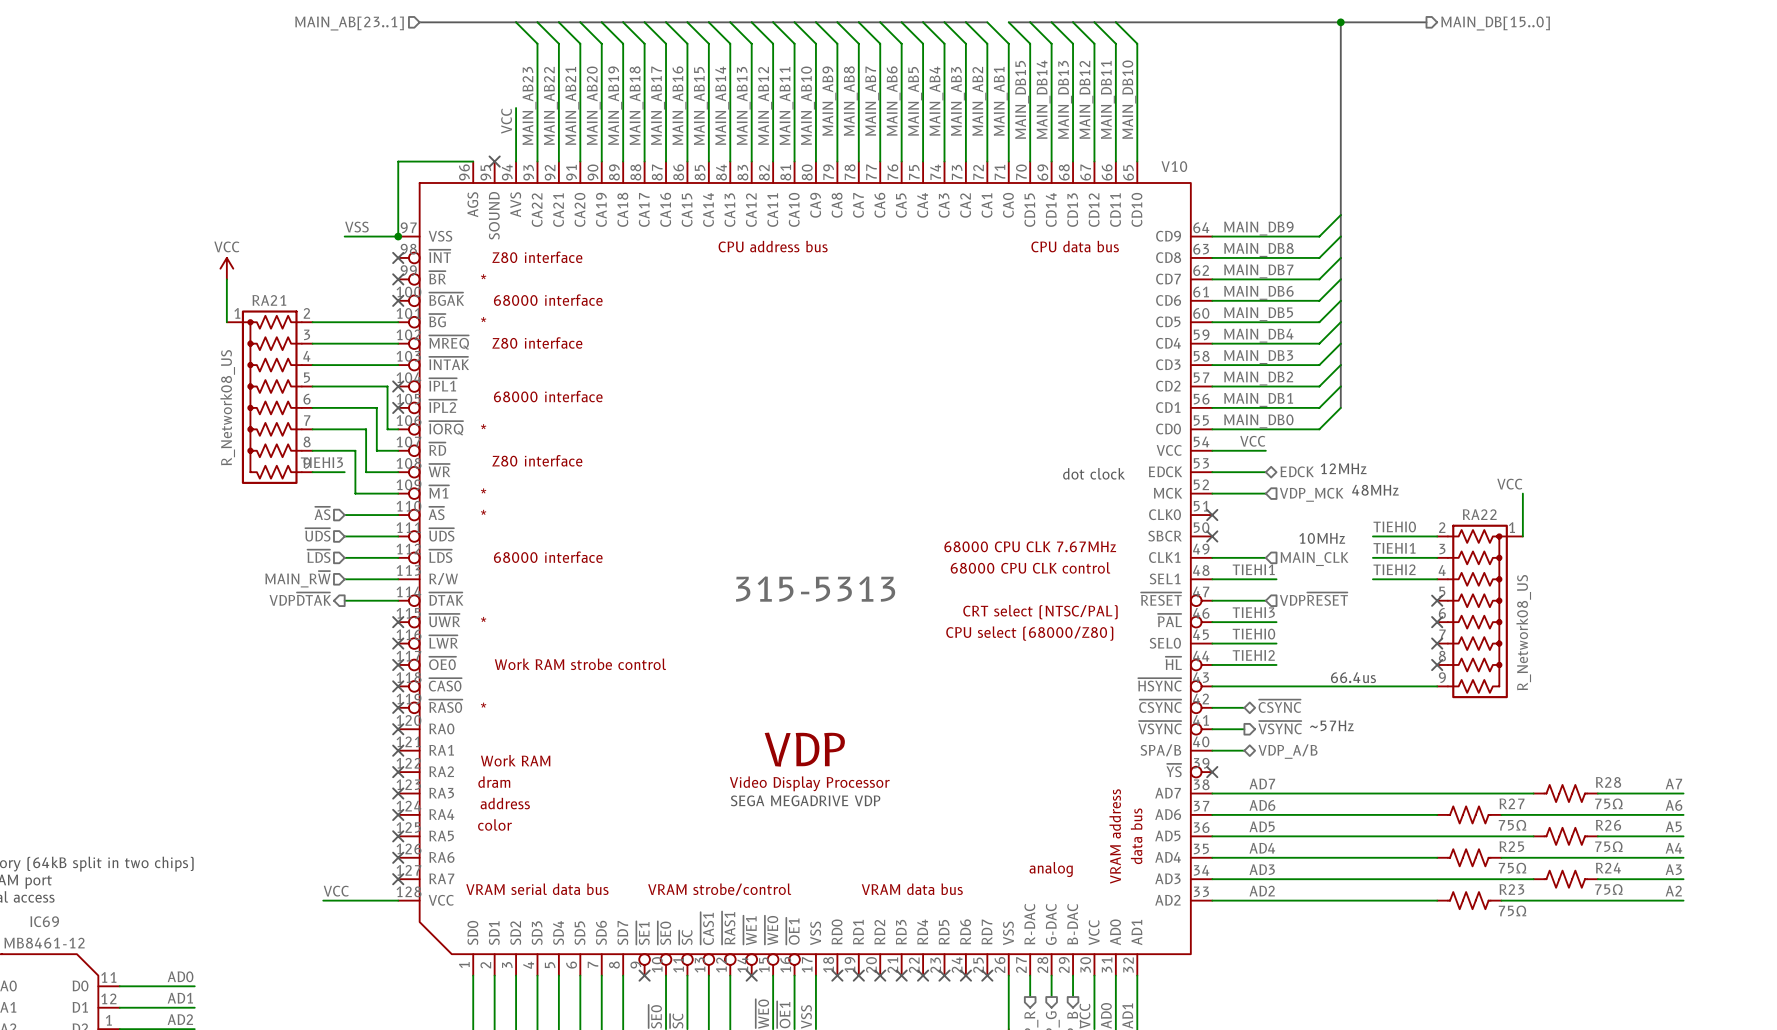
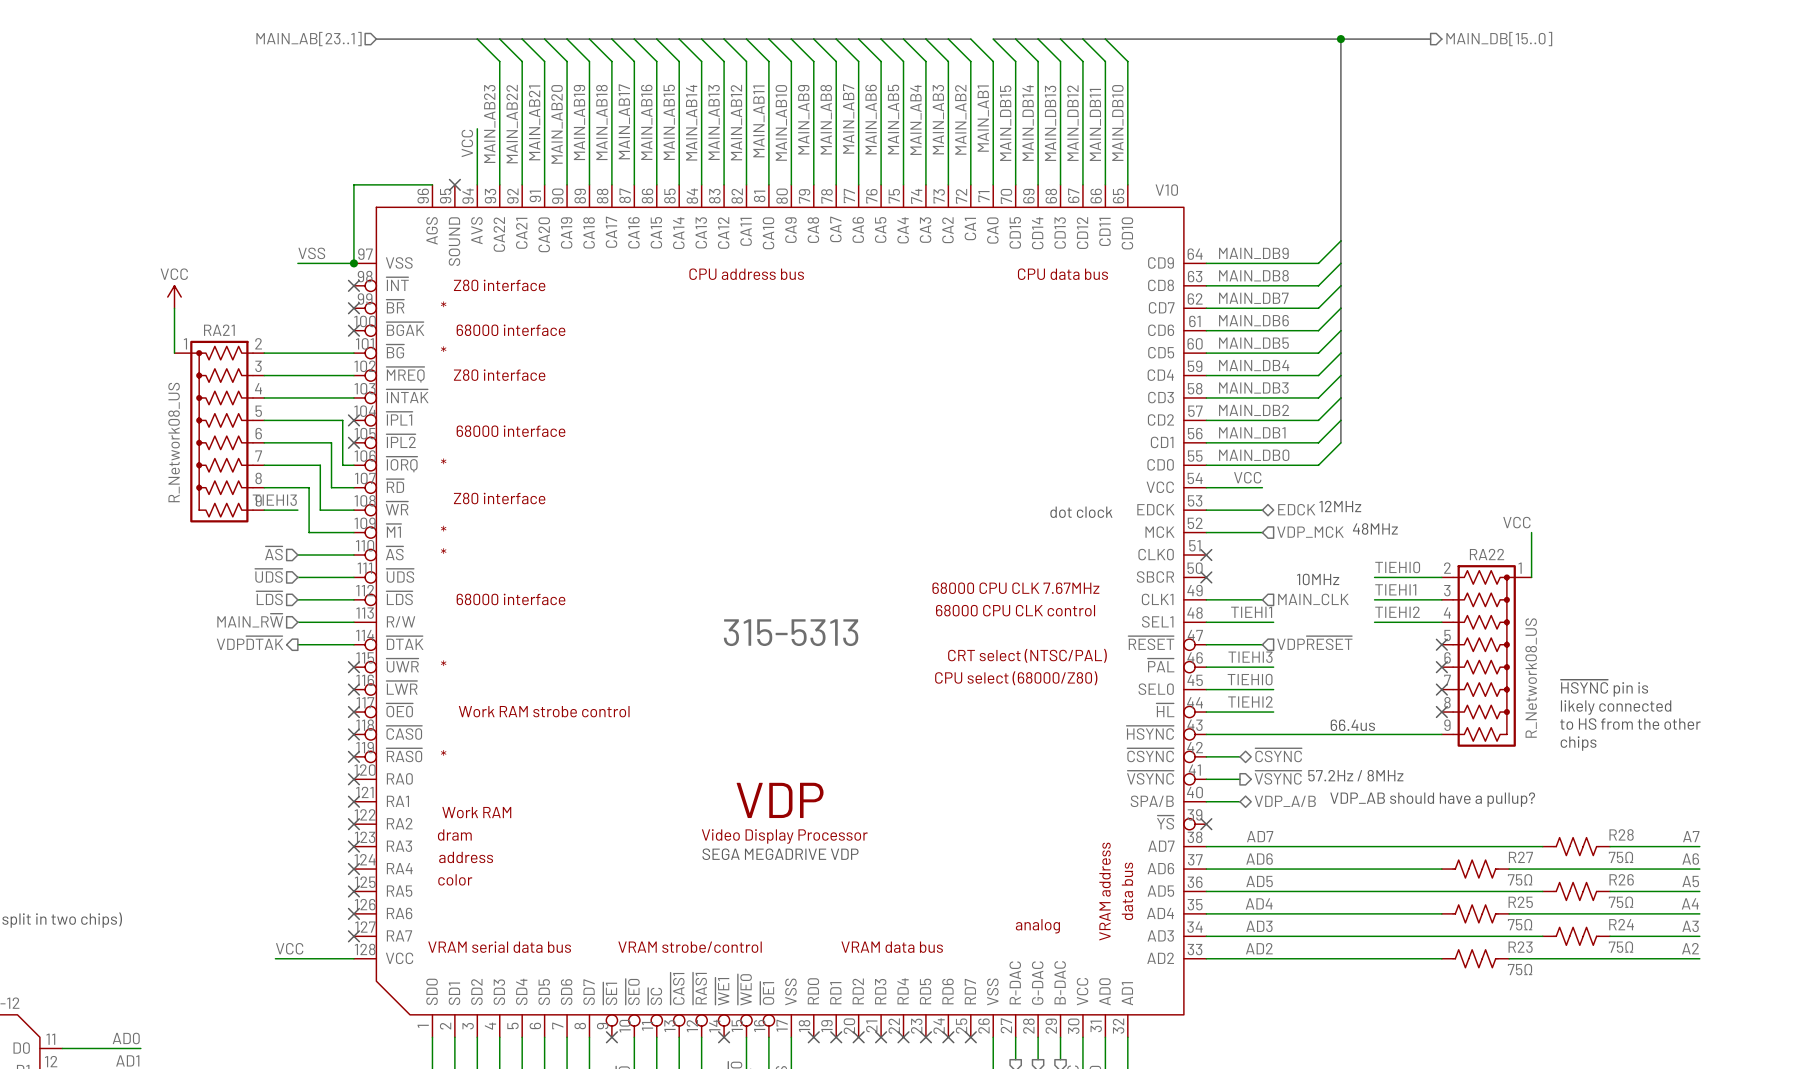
text: none -> ~{HSYNC} pin is (1604, 688)
text: none -> likely connected (1616, 707)
text: none -> to HS from the other (1630, 724)
text: none -> chips (1578, 743)
text: ~57Hz (1331, 725) -> 57.2Hz / 8MHz (1355, 775)
text: none -> VDP_AB should have a pullup? (1432, 799)

